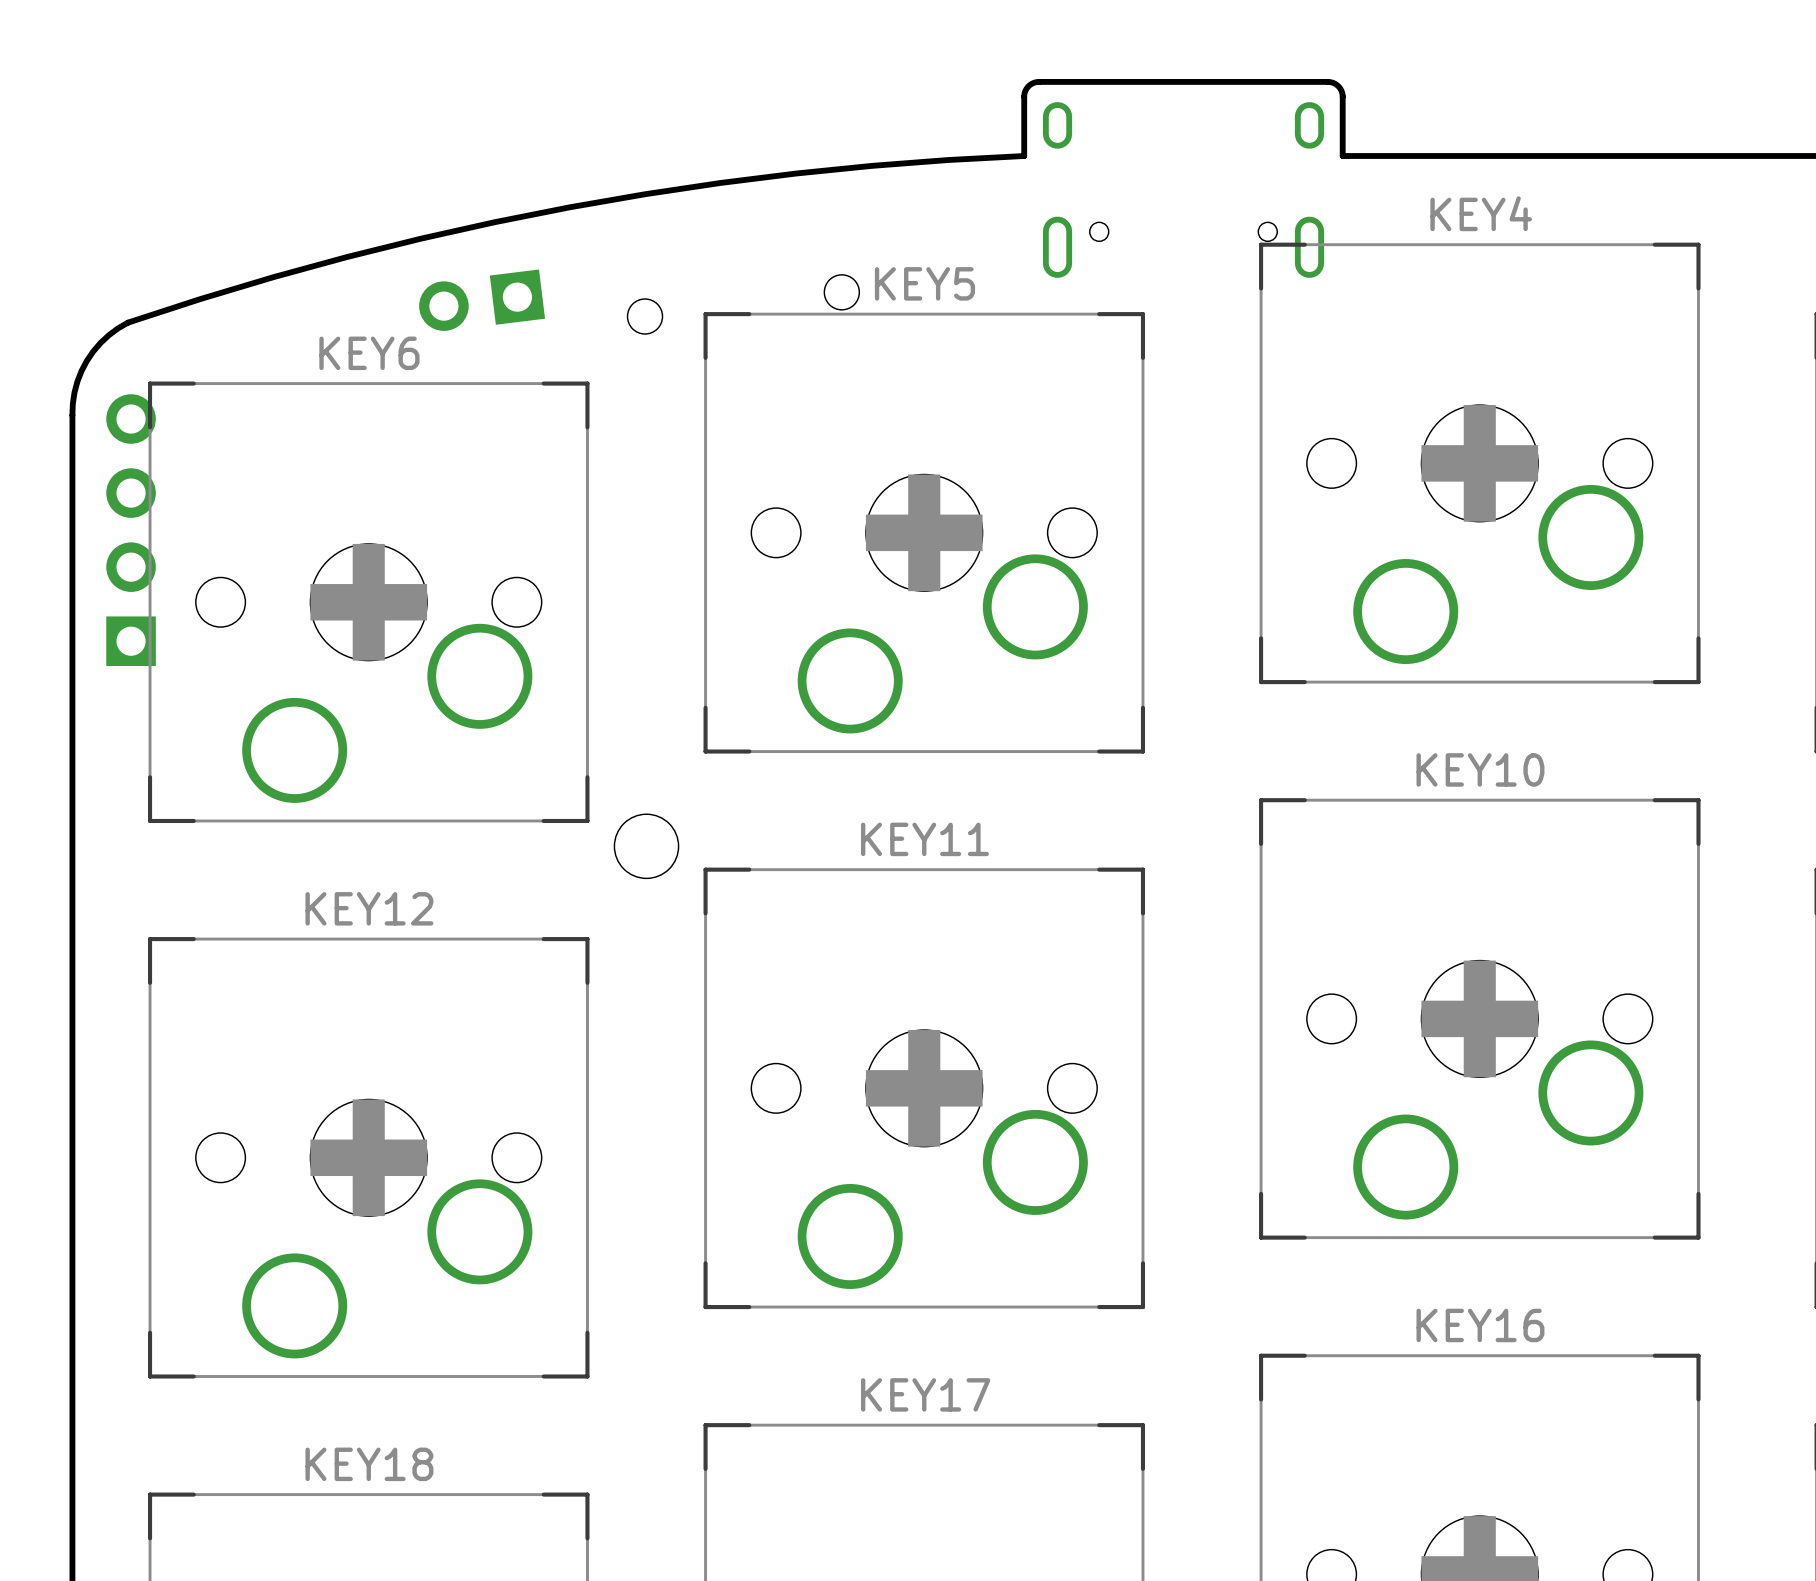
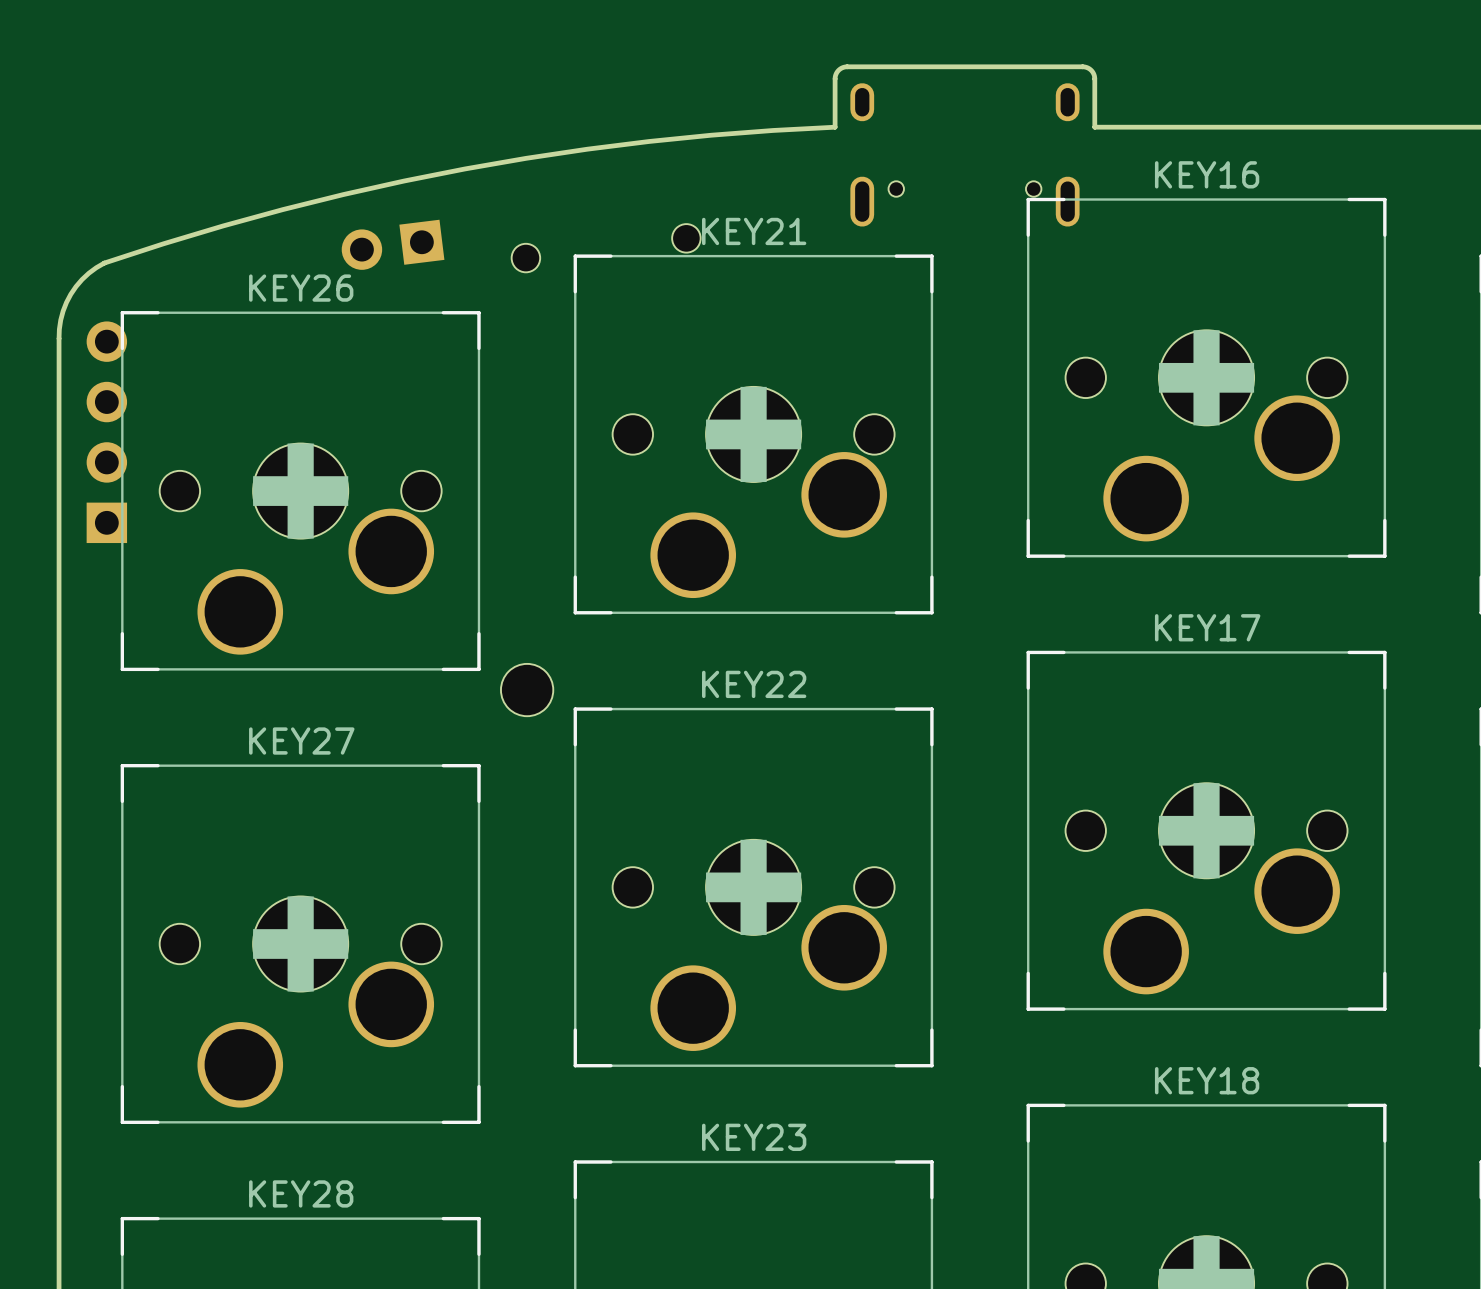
KEY4 name: KEY4 (1481, 213) -> KEY16 (1207, 174)
KEY5 name: KEY5 (924, 283) -> KEY21 (754, 231)
KEY6 name: KEY6 (369, 353) -> KEY26 (301, 288)
KEY10 name: KEY10 (1480, 769) -> KEY17 (1207, 627)
KEY11 name: KEY11 (924, 839) -> KEY22 (754, 684)
KEY12 name: KEY12 (369, 908) -> KEY27 (301, 741)
KEY16 name: KEY16 (1480, 1325) -> KEY18 (1207, 1080)
KEY17 name: KEY17 (925, 1394) -> KEY23 (754, 1137)
KEY18 name: KEY18 (369, 1464) -> KEY28 (301, 1193)

